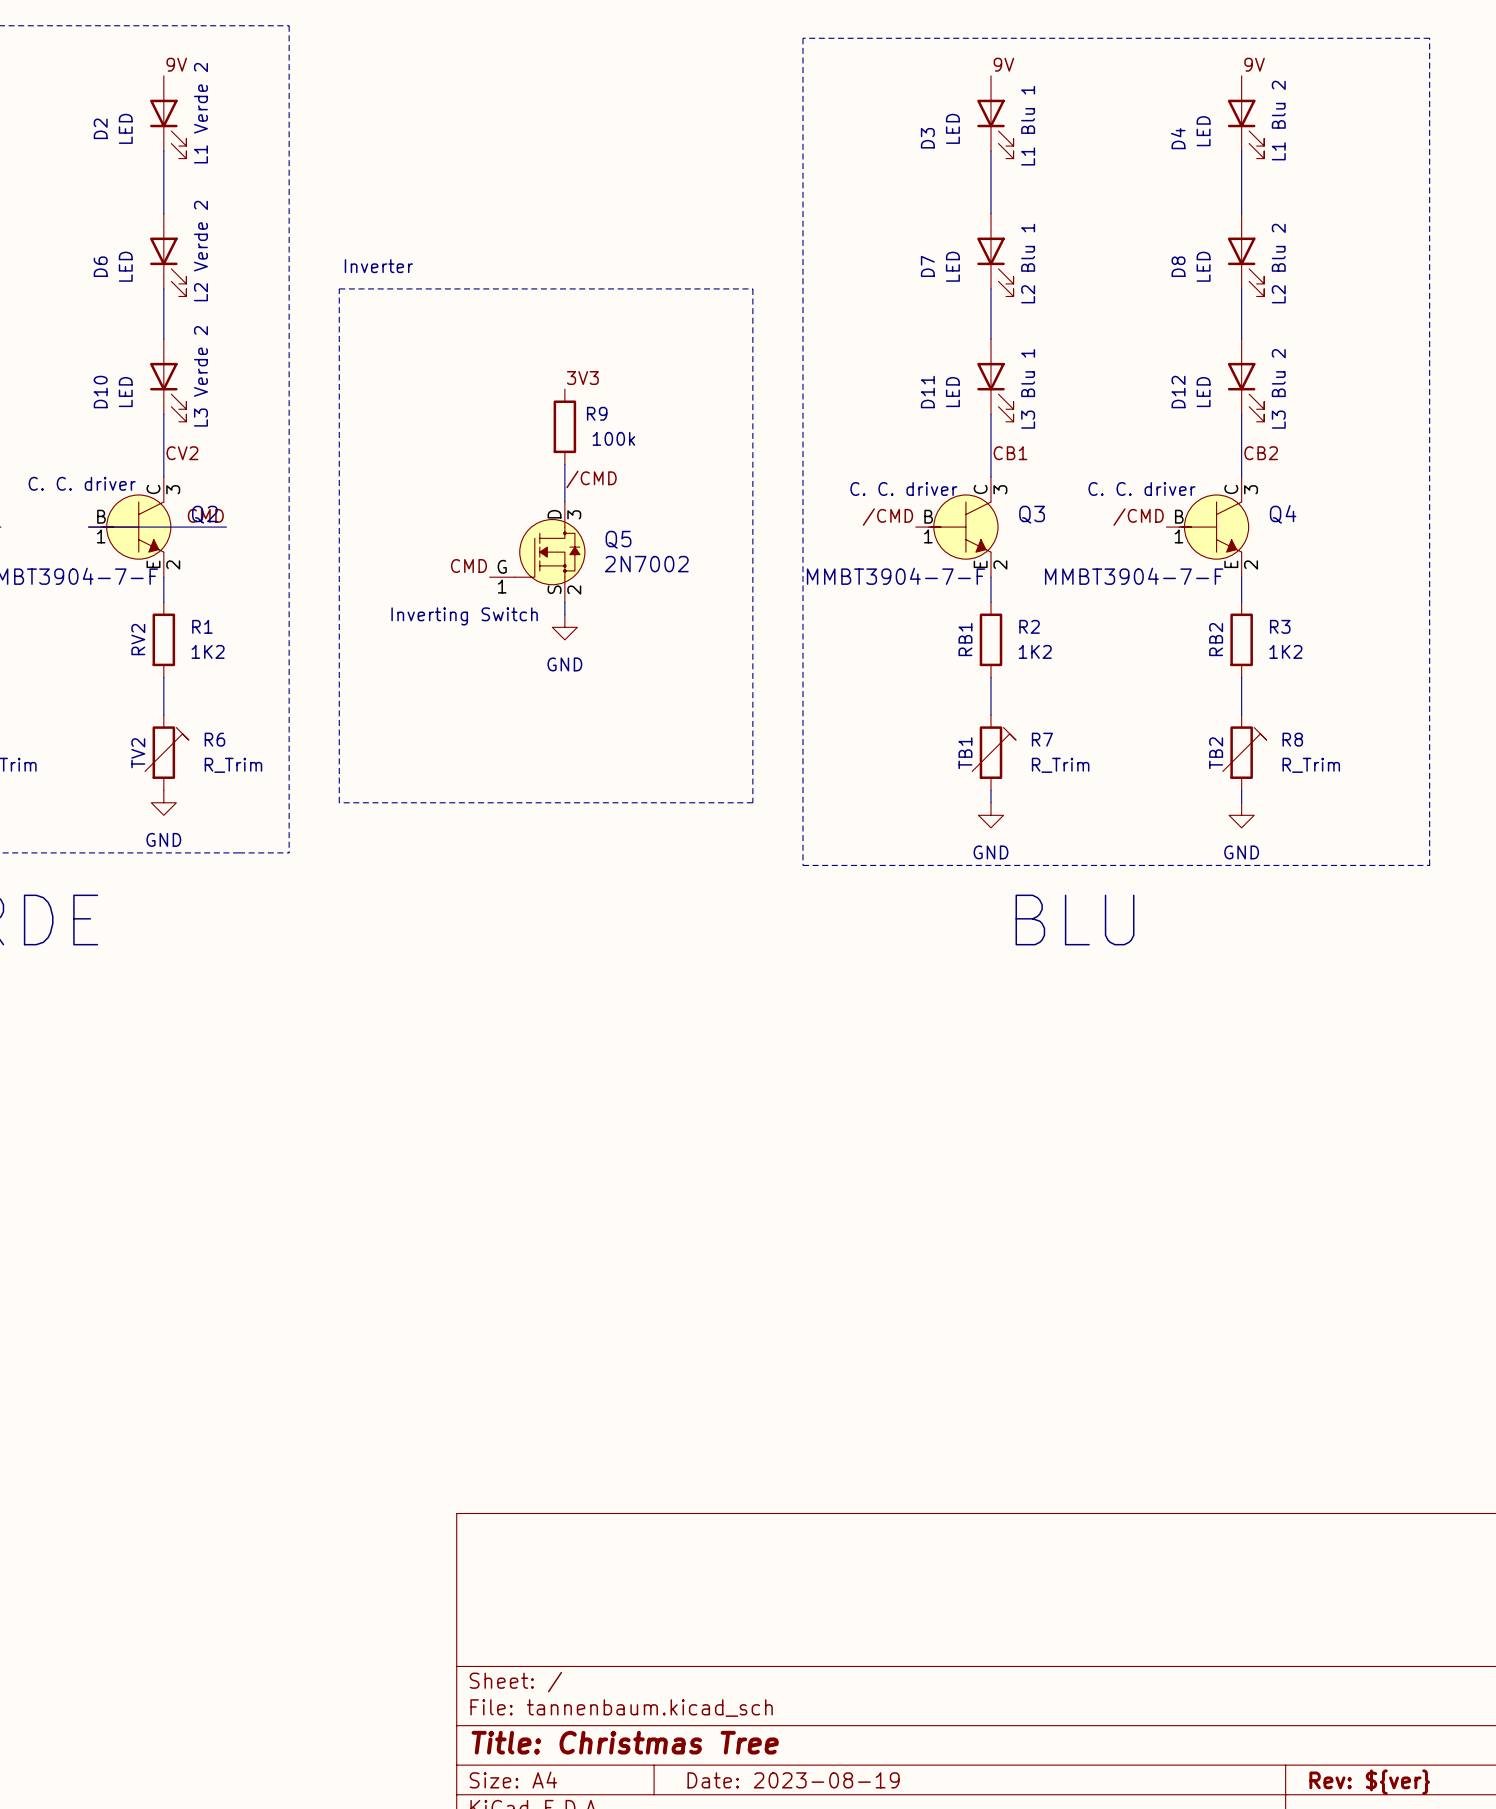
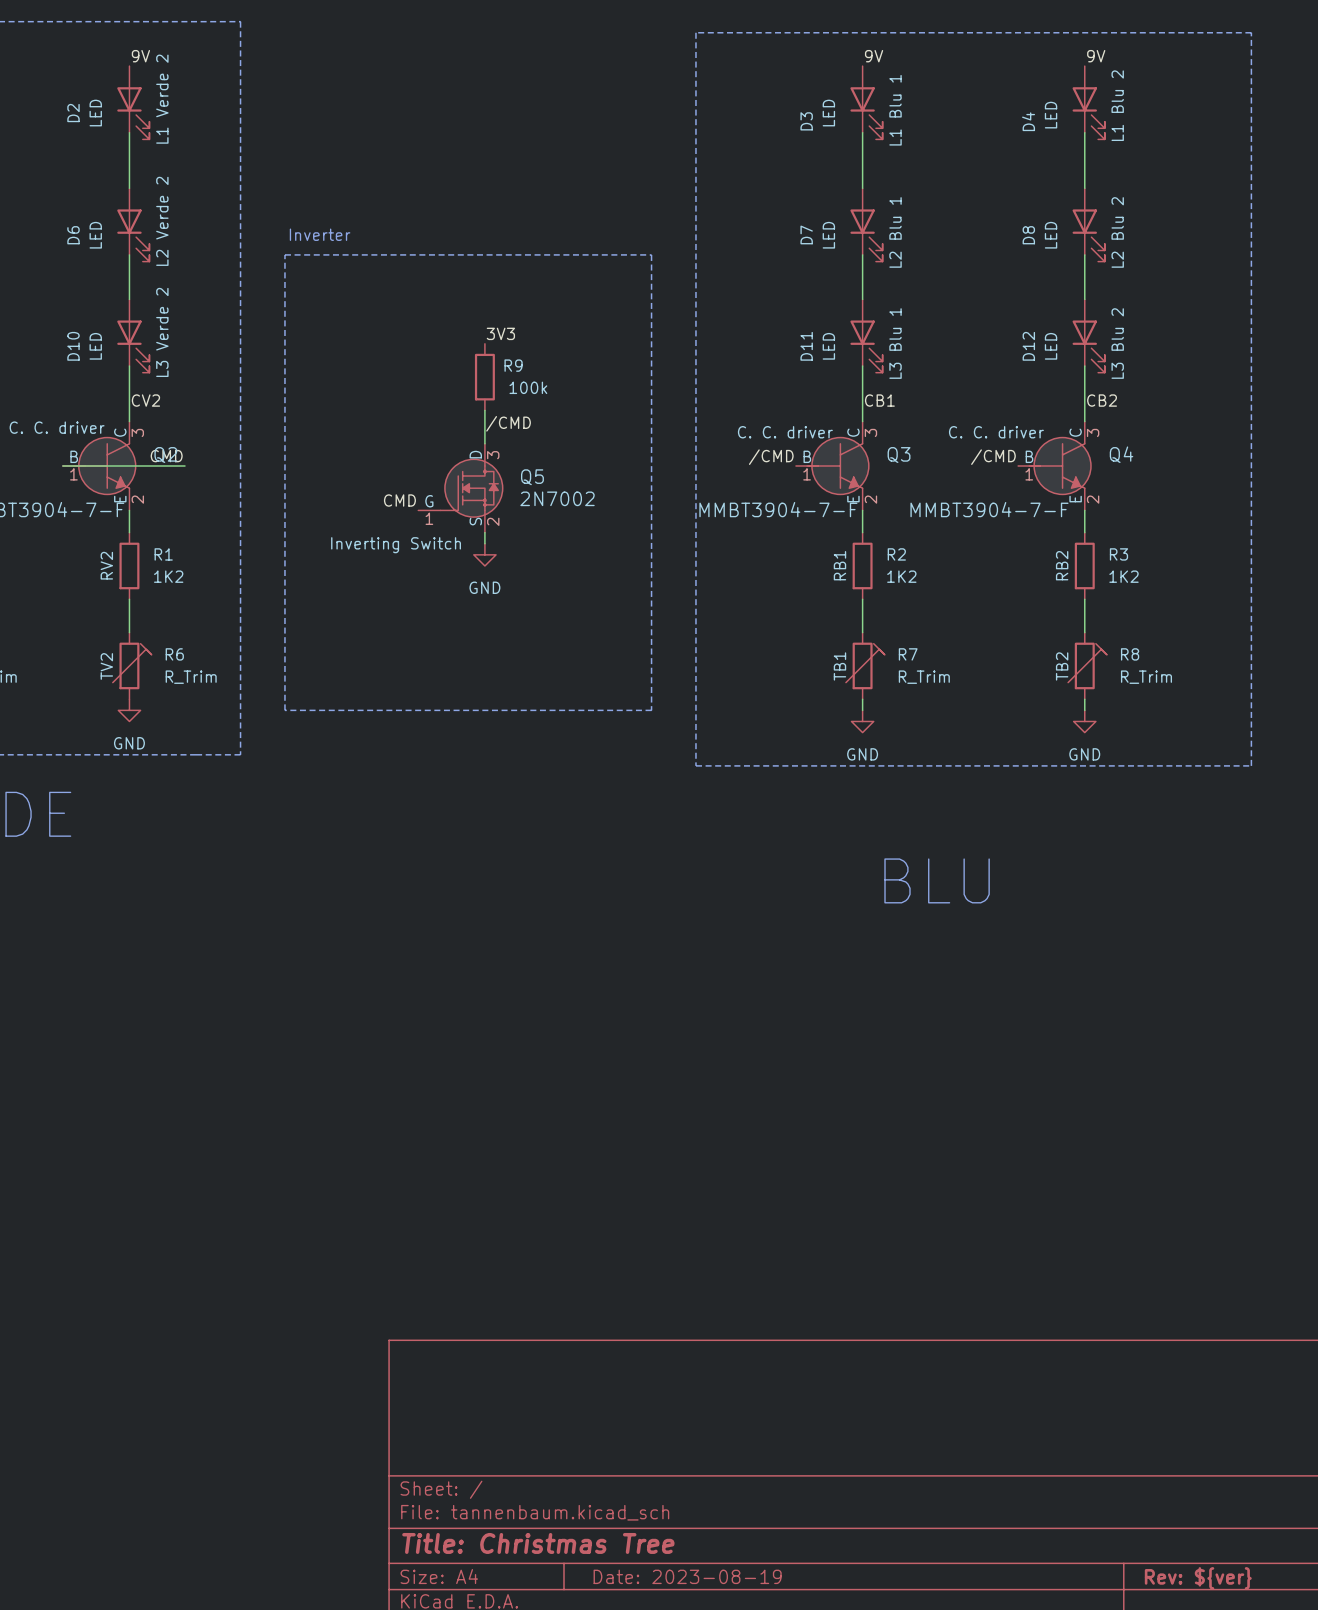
text position: BLU (1075, 920) -> BLU (937, 880)

